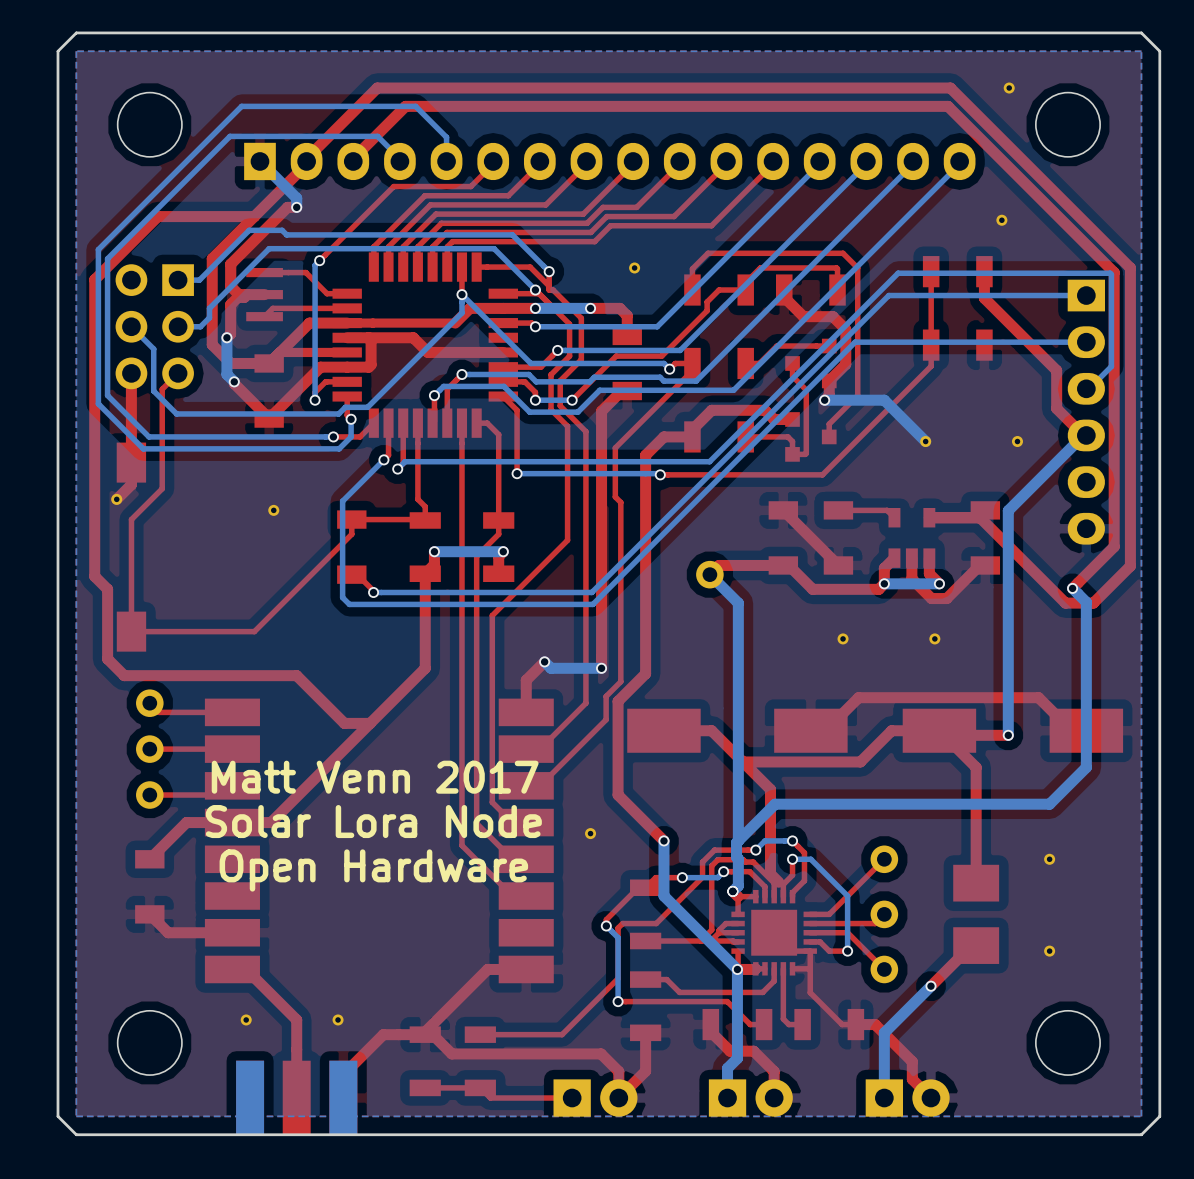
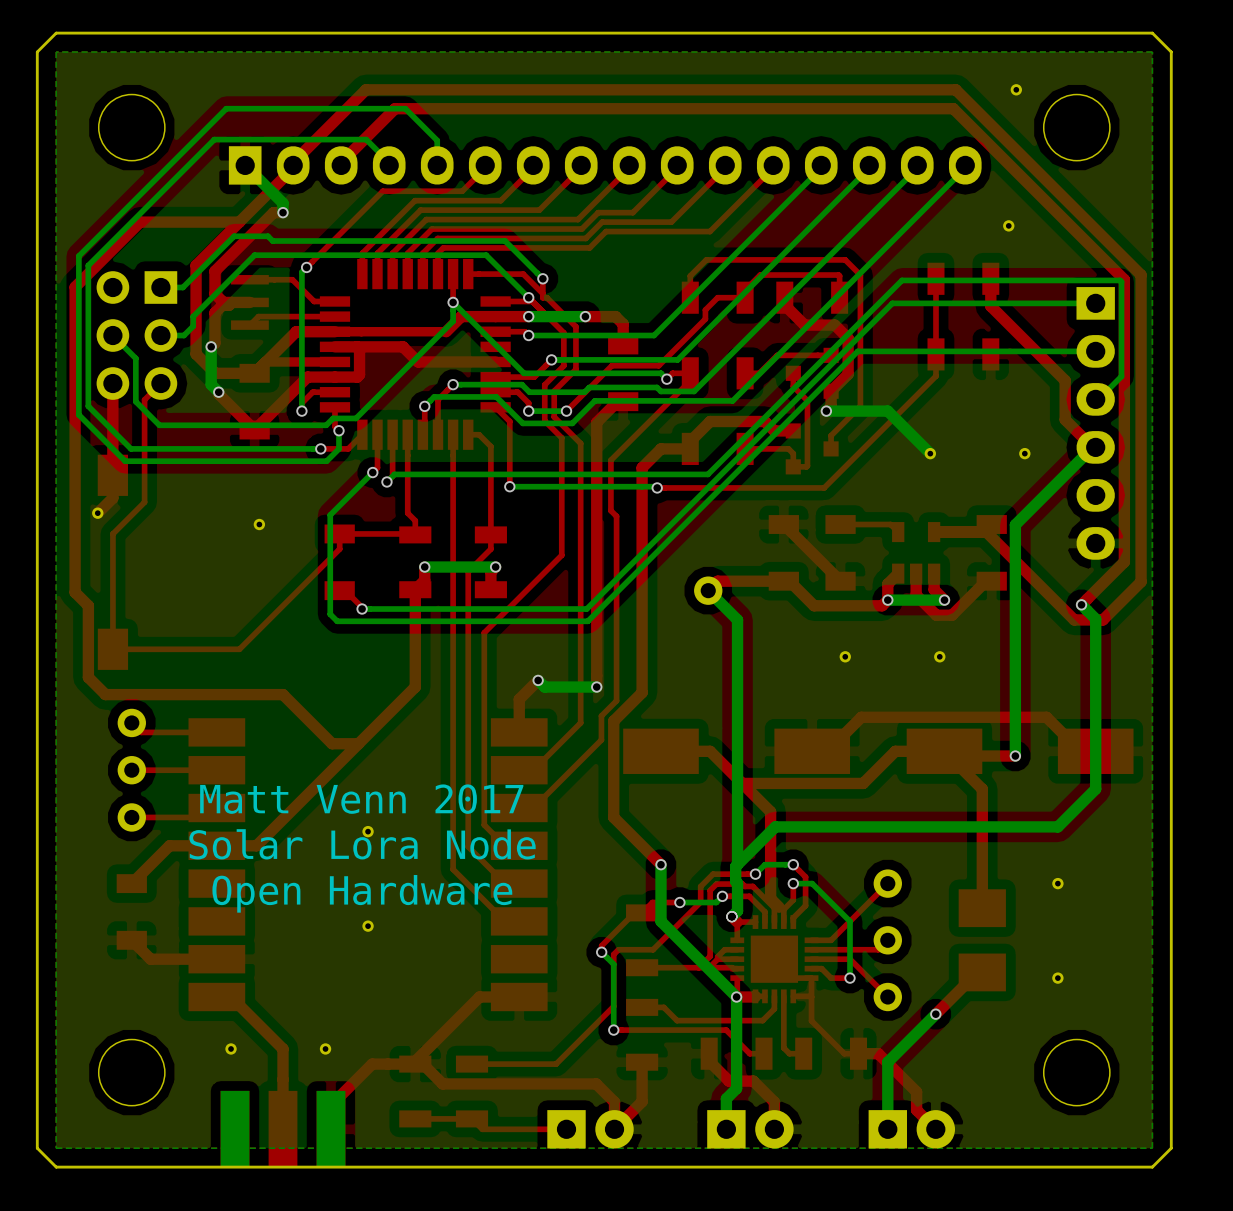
part: (634, 267) -> none
part: none -> (368, 831)
part: (590, 833) -> none
part: none -> (368, 926)

